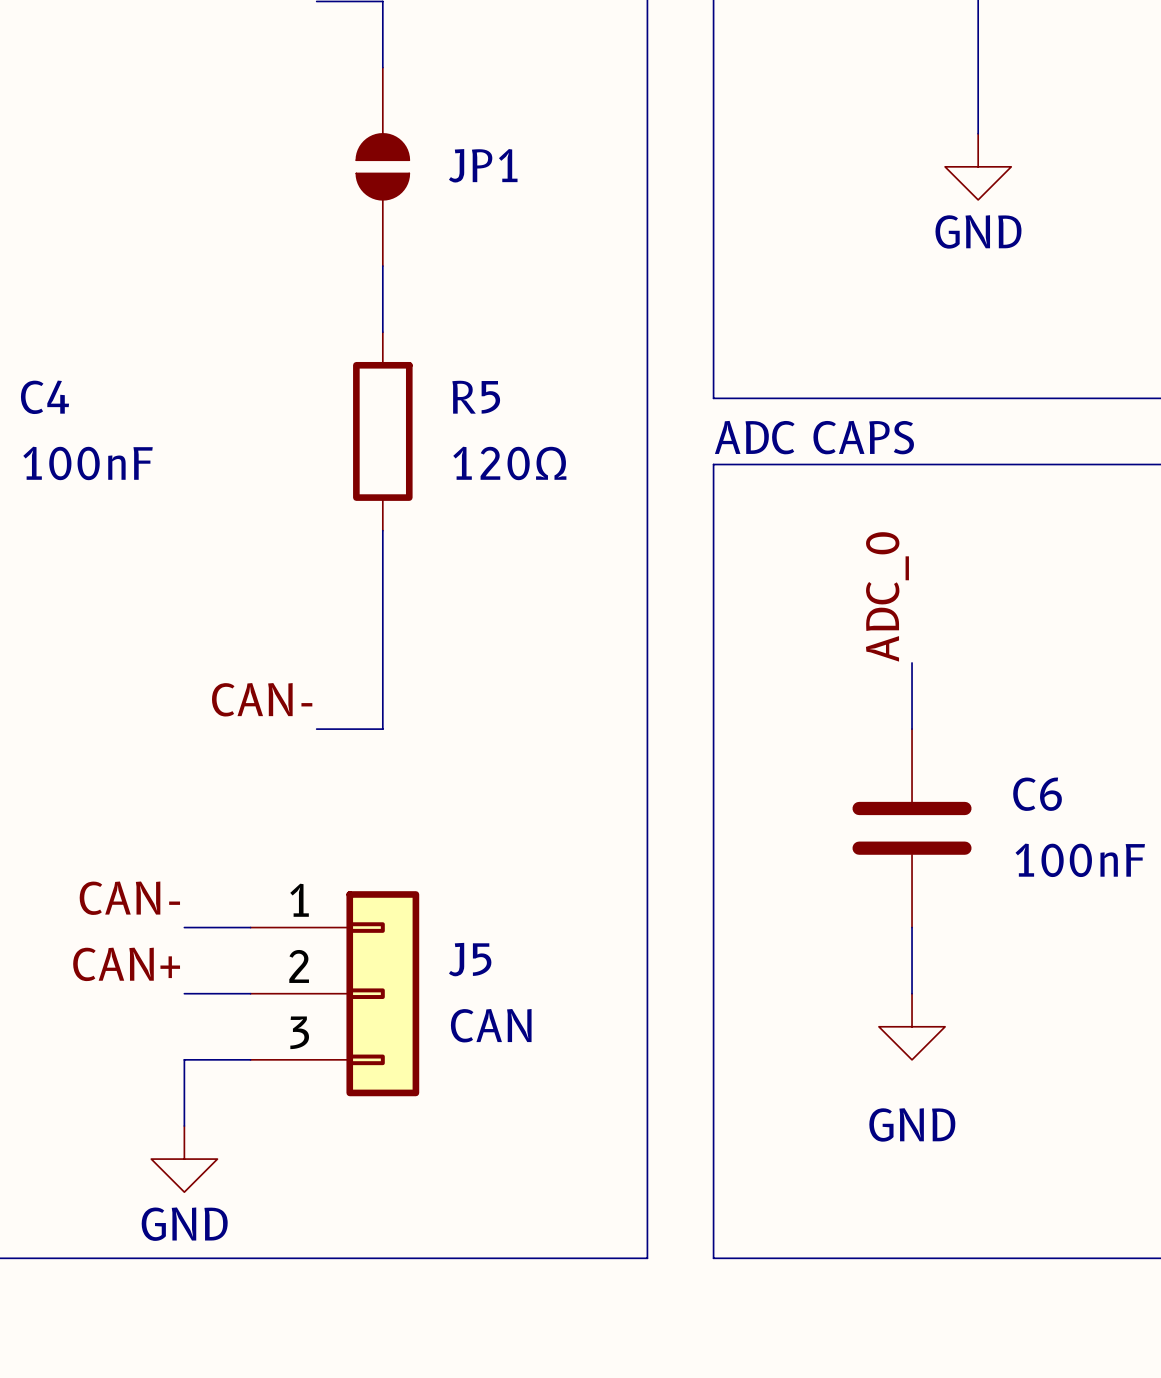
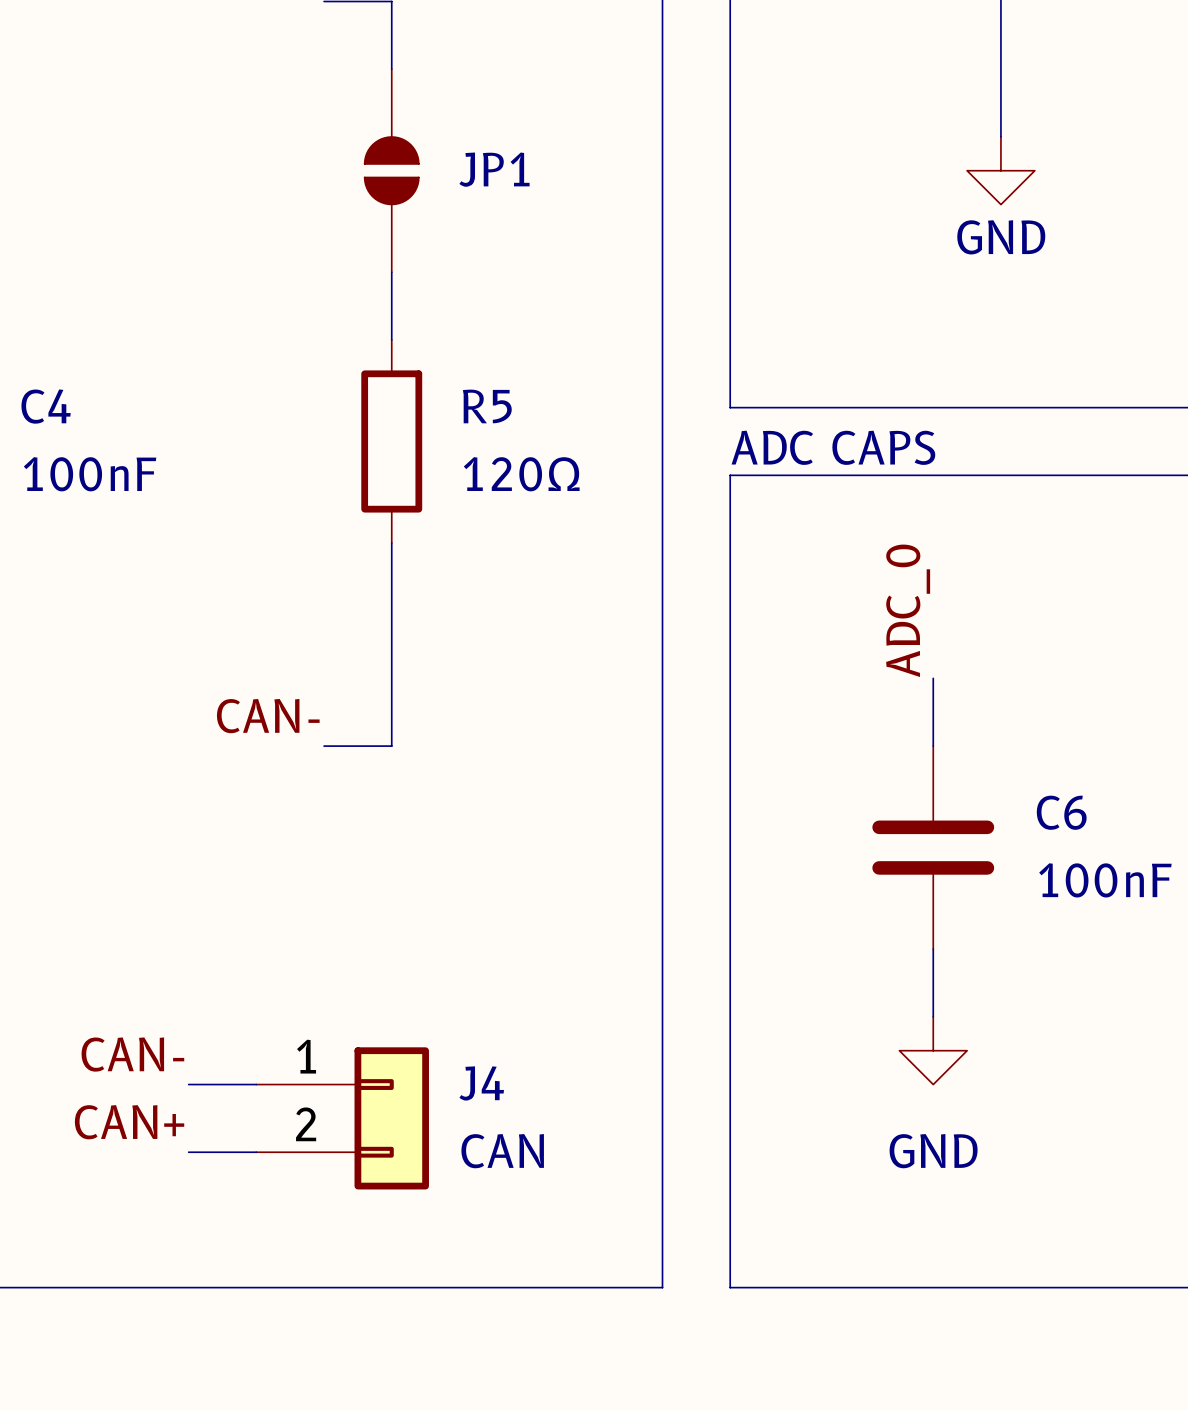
label position: CAN- (129, 898) -> CAN- (132, 1054)
wire: (184, 927) (250, 927) -> none
label position: CAN+ (126, 964) -> CAN+ (129, 1122)
wire: (184, 993) (250, 993) -> none
J5: CAN (334, 993) -> none
wire: (184, 1059) (184, 1126) -> (256, 1152) (188, 1152)
J4: none -> CAN (342, 1118)
power symbol: GND (184, 1159) -> none

